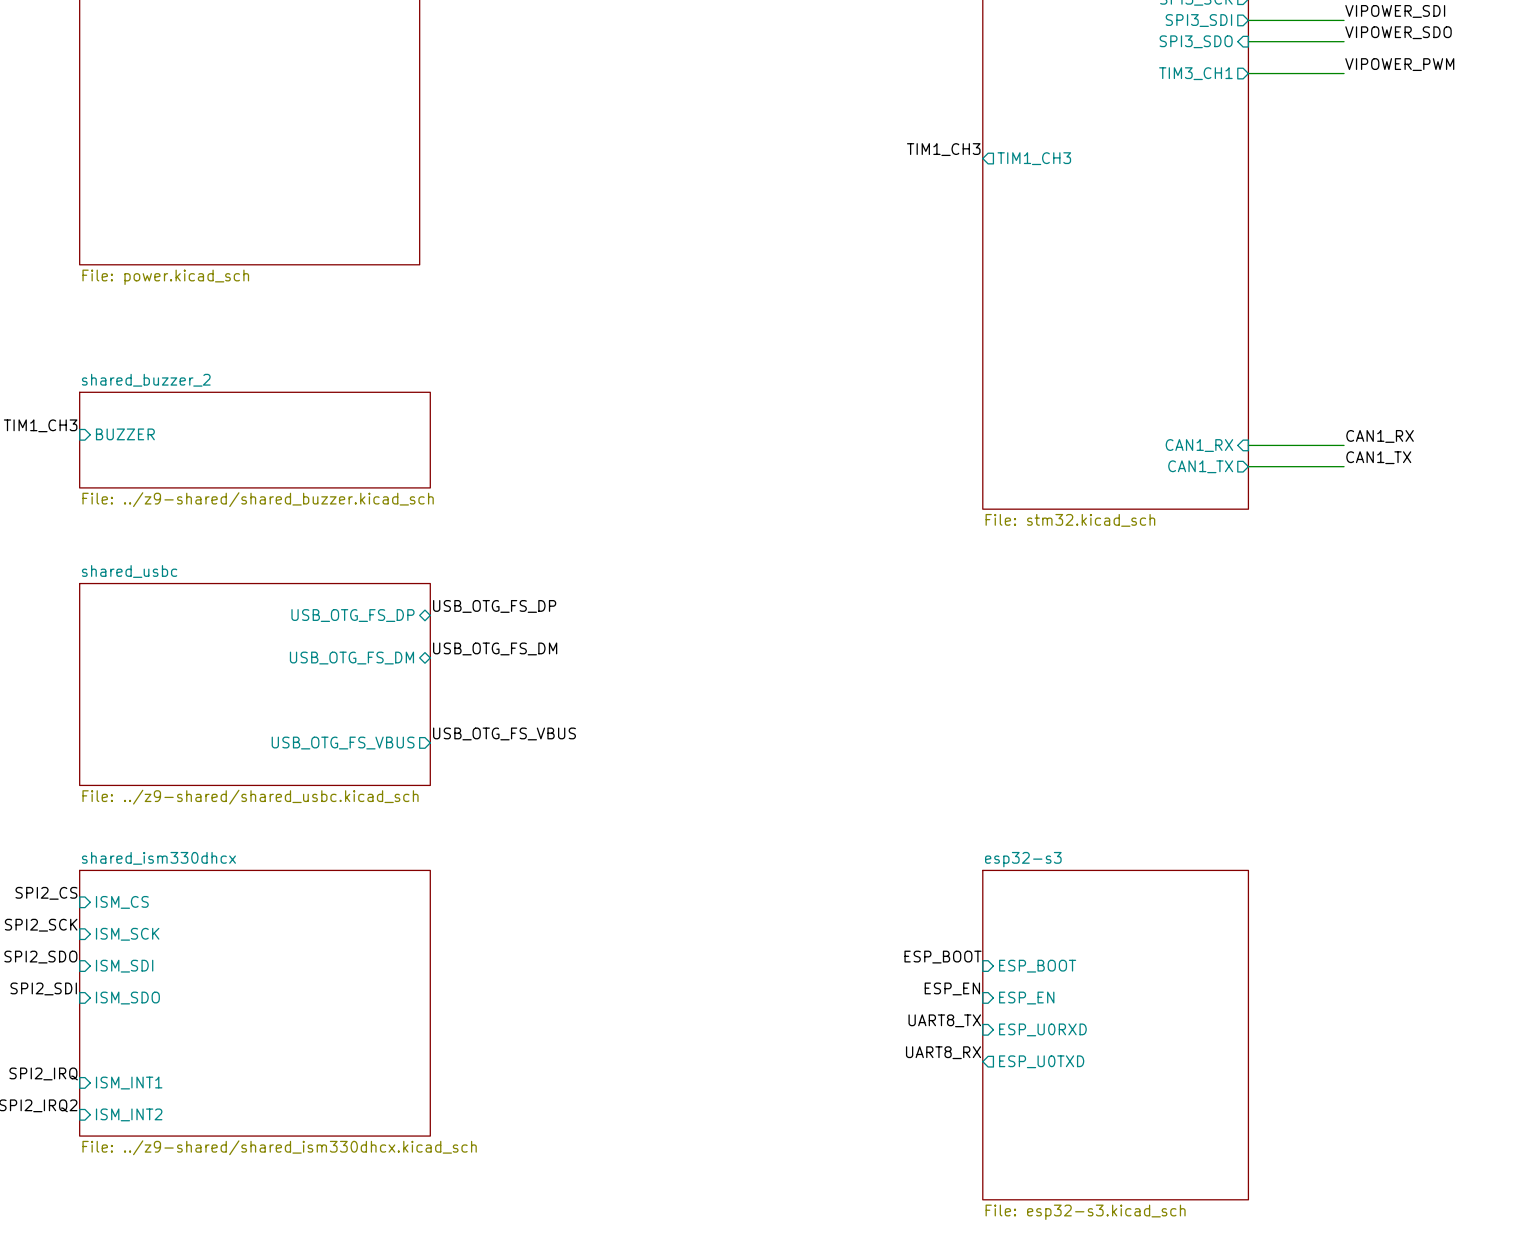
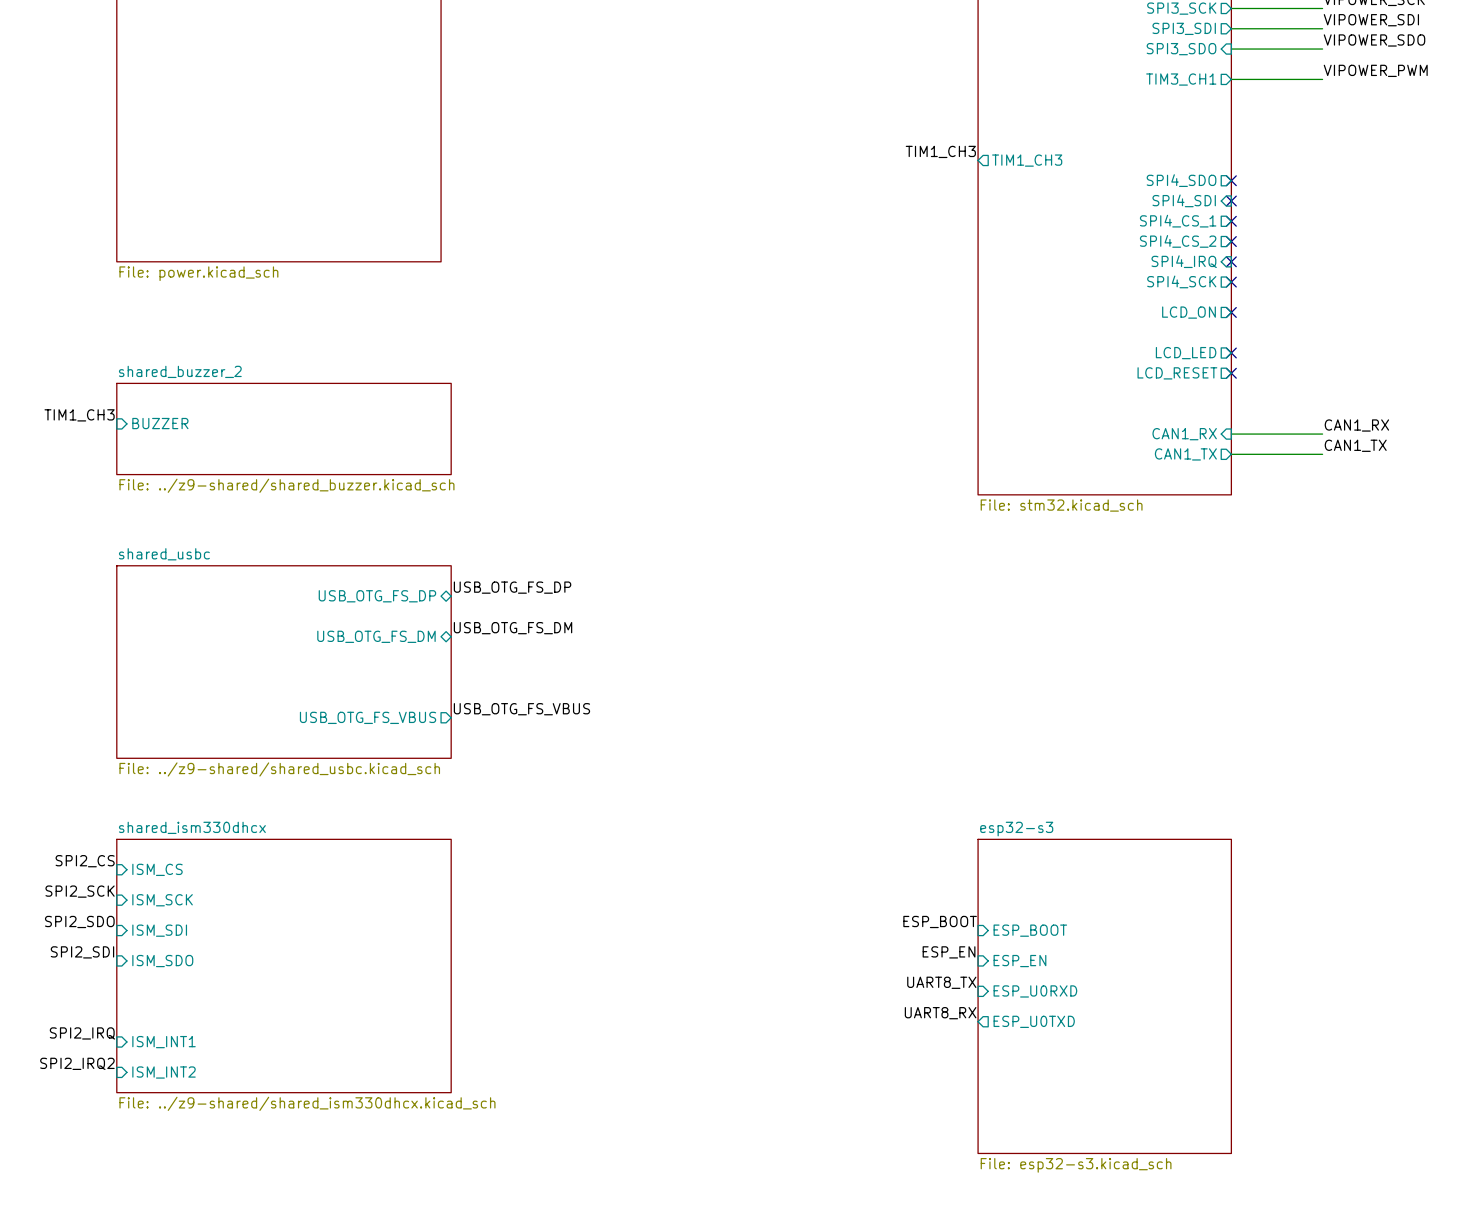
sheet pin: none -> SPI4_SDO (1181, 180)
no-connect mark: none -> (1231, 180)
sheet pin: none -> SPI4_SDI (1184, 200)
no-connect mark: none -> (1231, 201)
sheet pin: none -> SPI4_CS_1 (1178, 221)
no-connect mark: none -> (1231, 221)
sheet pin: none -> SPI4_CS_2 (1178, 241)
no-connect mark: none -> (1231, 241)
sheet pin: none -> SPI4_IRQ (1184, 261)
no-connect mark: none -> (1231, 261)
sheet pin: none -> SPI4_SCK (1181, 281)
no-connect mark: none -> (1231, 282)
no-connect mark: none -> (1231, 312)
sheet pin: none -> LCD_ON (1188, 312)
sheet pin: none -> LCD_LED (1186, 353)
no-connect mark: none -> (1231, 352)
sheet pin: none -> LCD_RESET (1177, 373)
no-connect mark: none -> (1231, 373)

